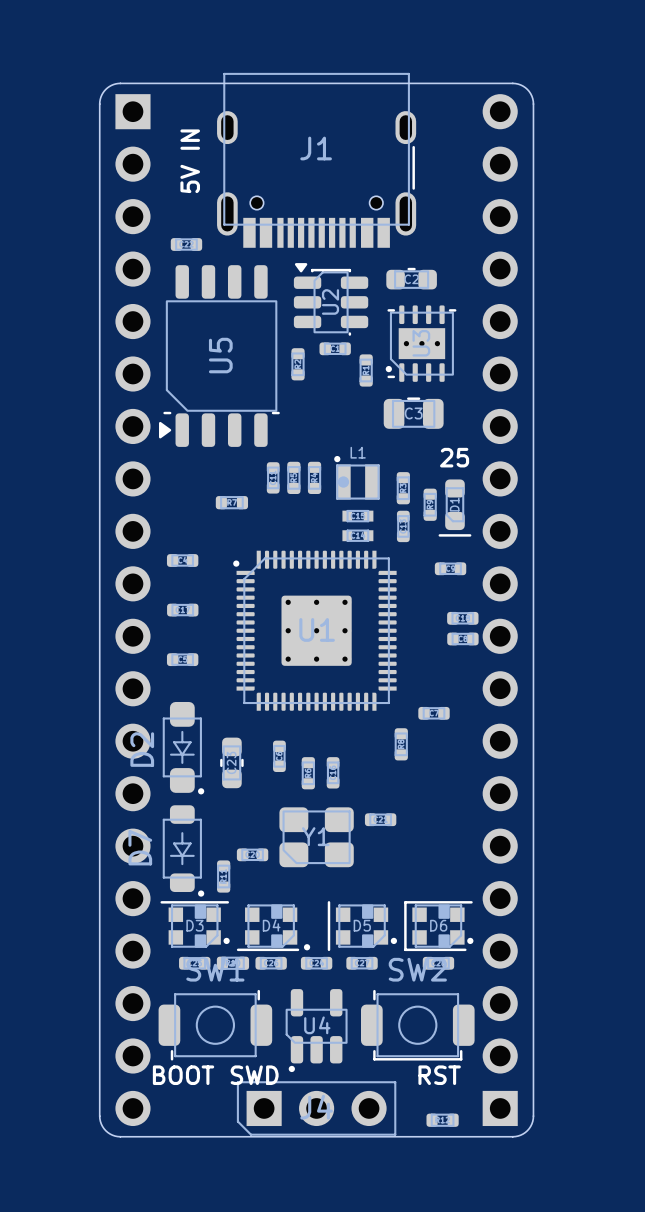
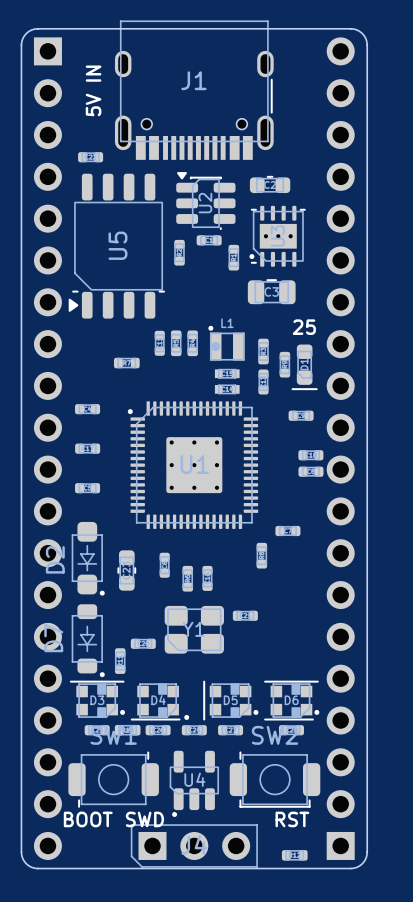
D6 footprint: [404, 901, 473, 952] -> [264, 680, 319, 721]

